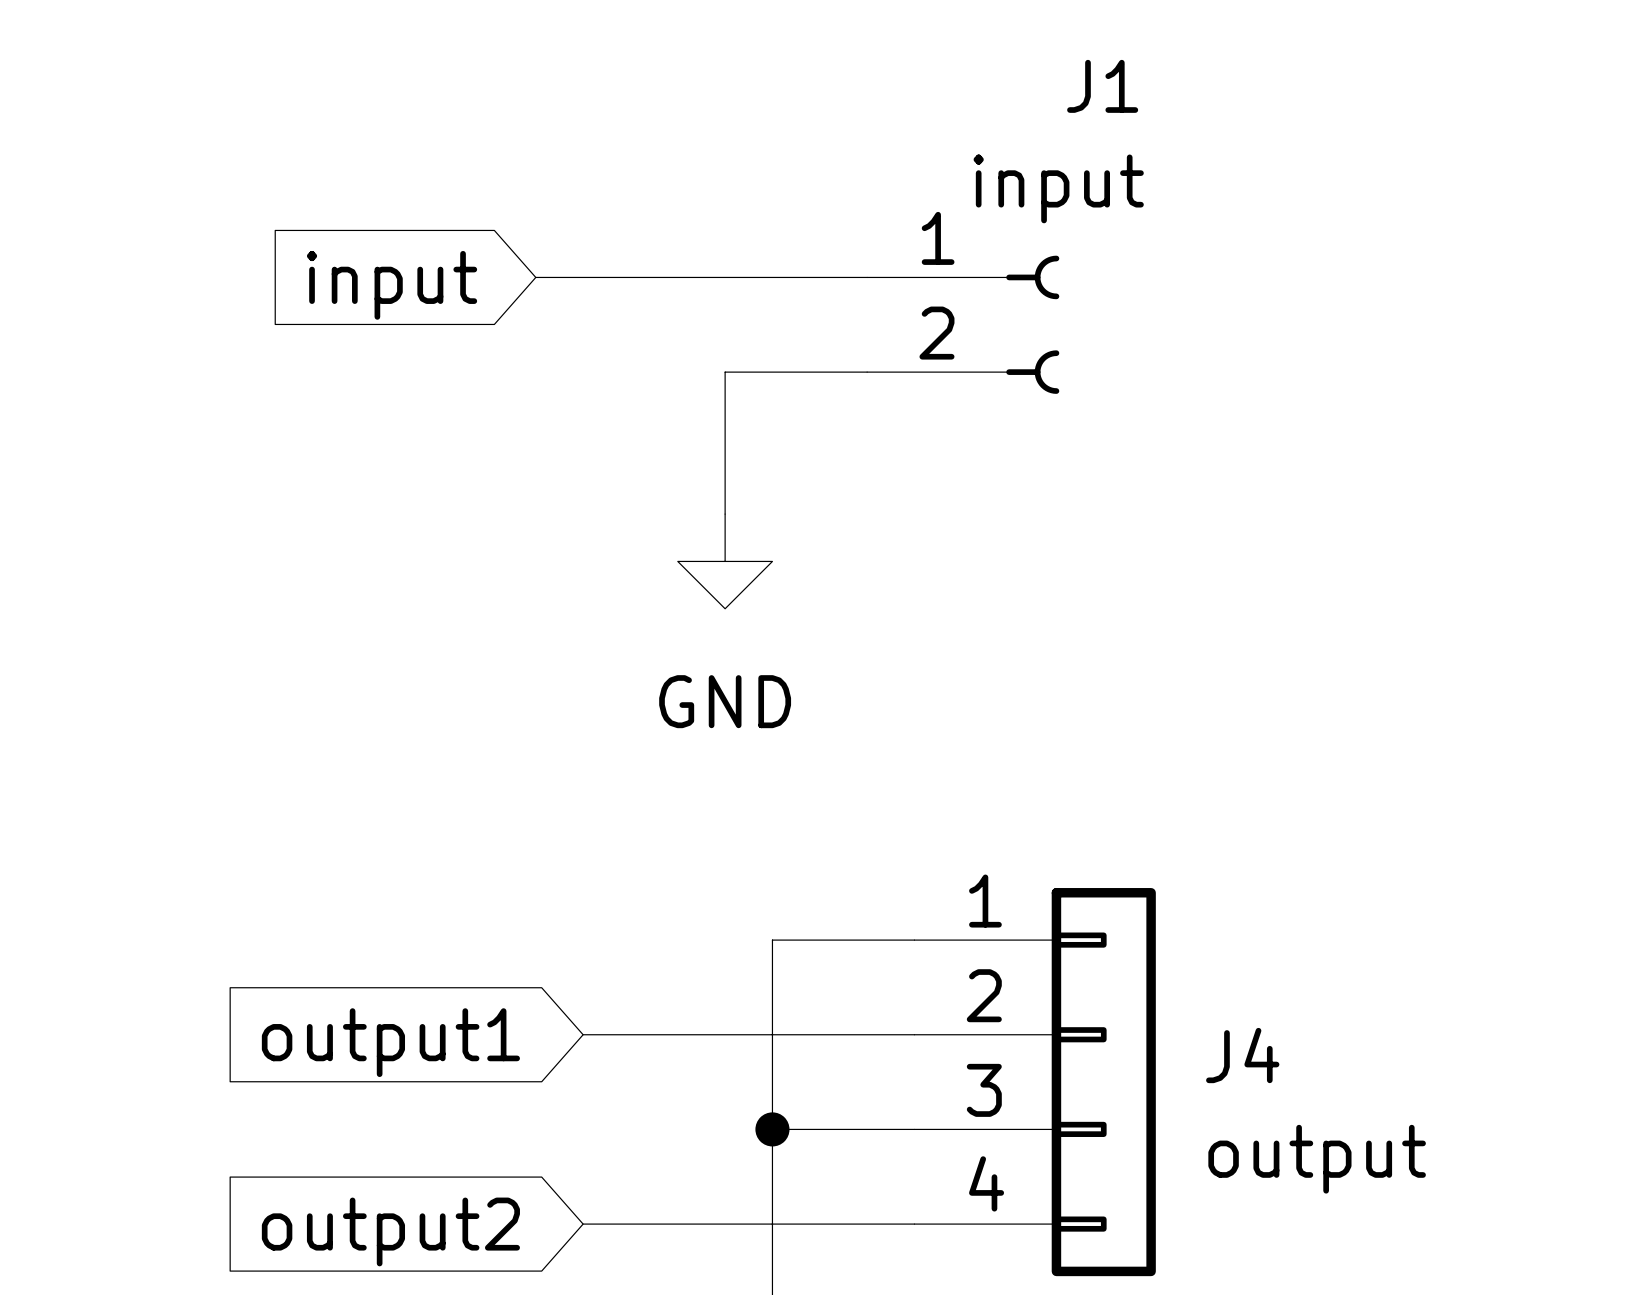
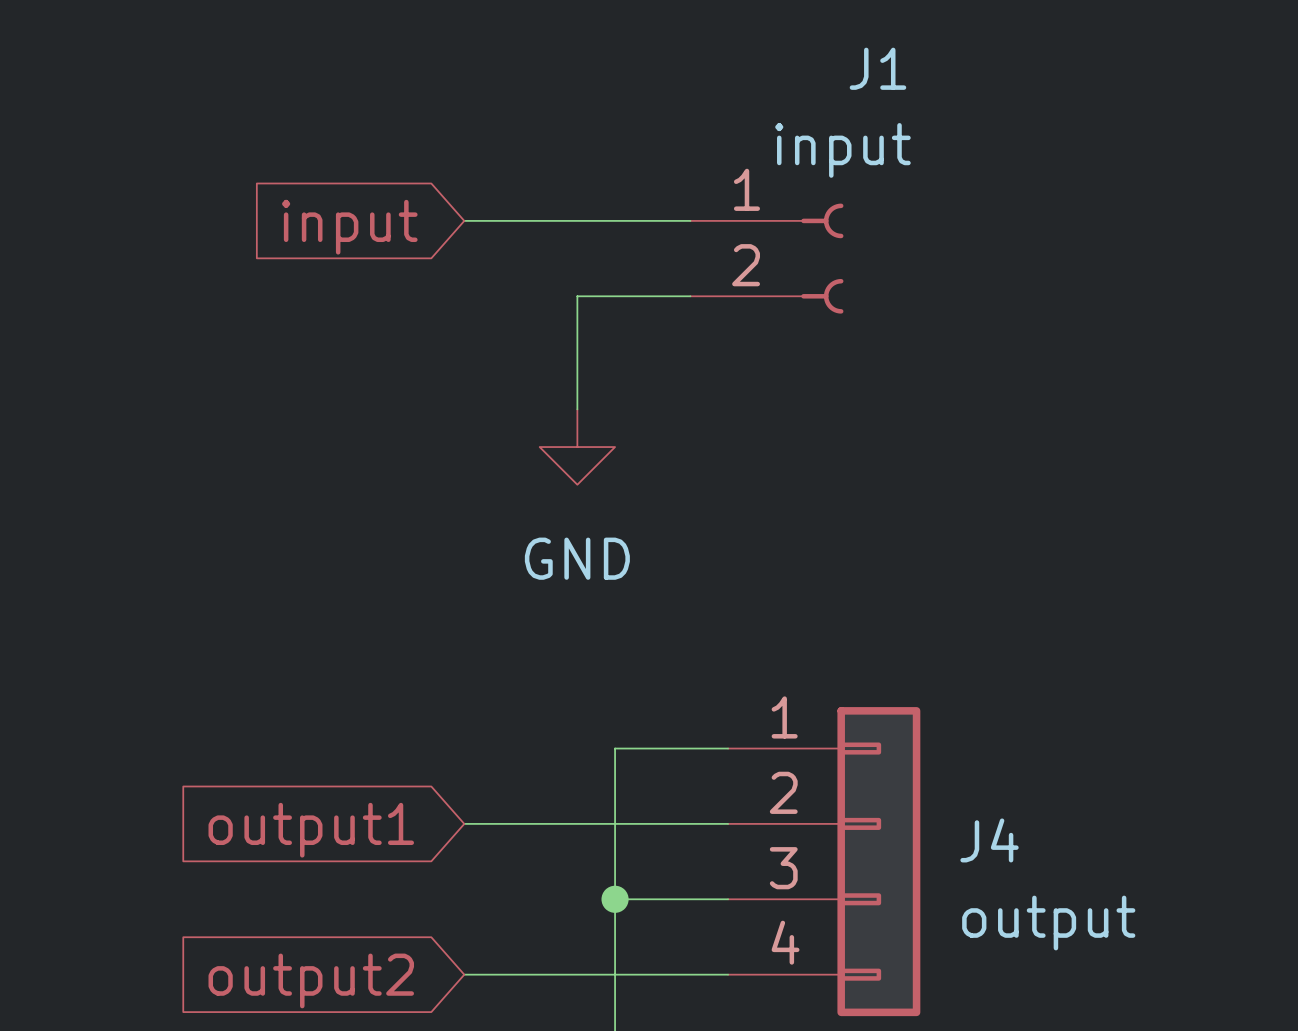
wire: (535, 277) (583, 277) -> none
global label position: input (392, 285) -> input (349, 227)

